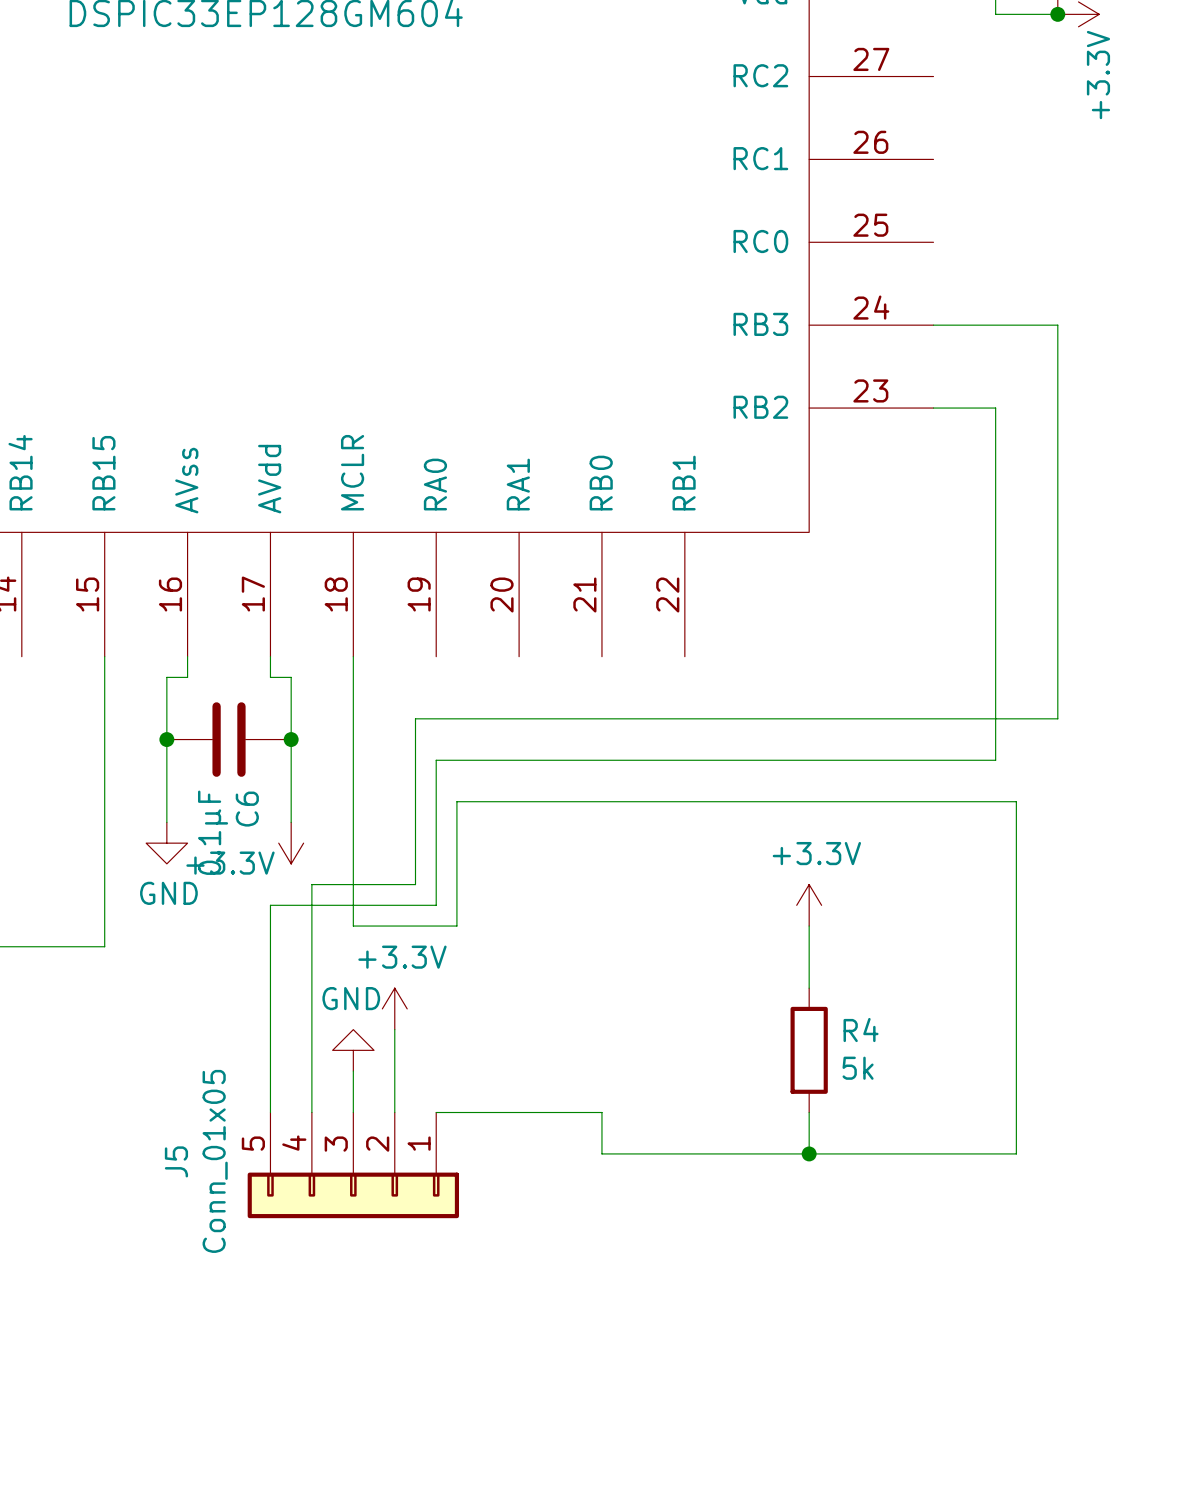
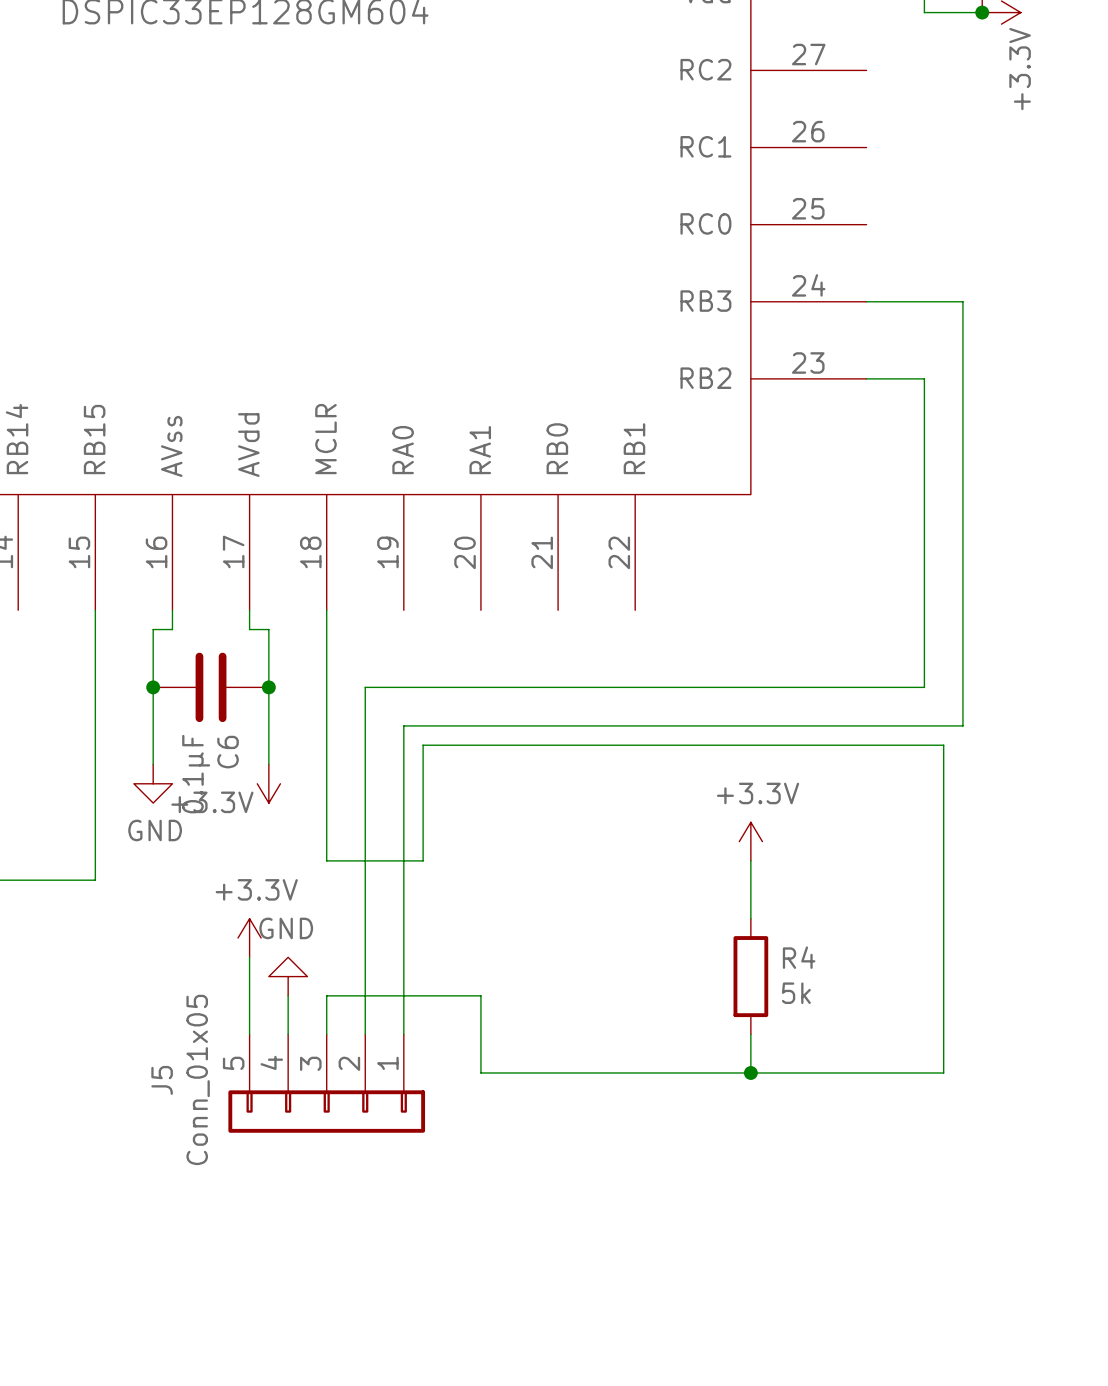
wire: (1037, 325) (1057, 325) (1057, 718) (415, 718) (415, 884) (311, 884) (311, 1071) -> (962, 301) (962, 725) (403, 725)
wire: (995, 739) (995, 760) (436, 760) (436, 780) -> (924, 687) (365, 687) (365, 957)
wire: (436, 905) (270, 905) (270, 1029) -> (403, 841) (403, 1034)
power symbol position: +3.3V (394, 1008) -> +3.3V (249, 938)
power symbol position: GND (353, 1050) -> GND (288, 976)
wire: (436, 1112) (601, 1112) (601, 1153) -> (326, 995) (480, 995) (480, 1072) (558, 1072)

